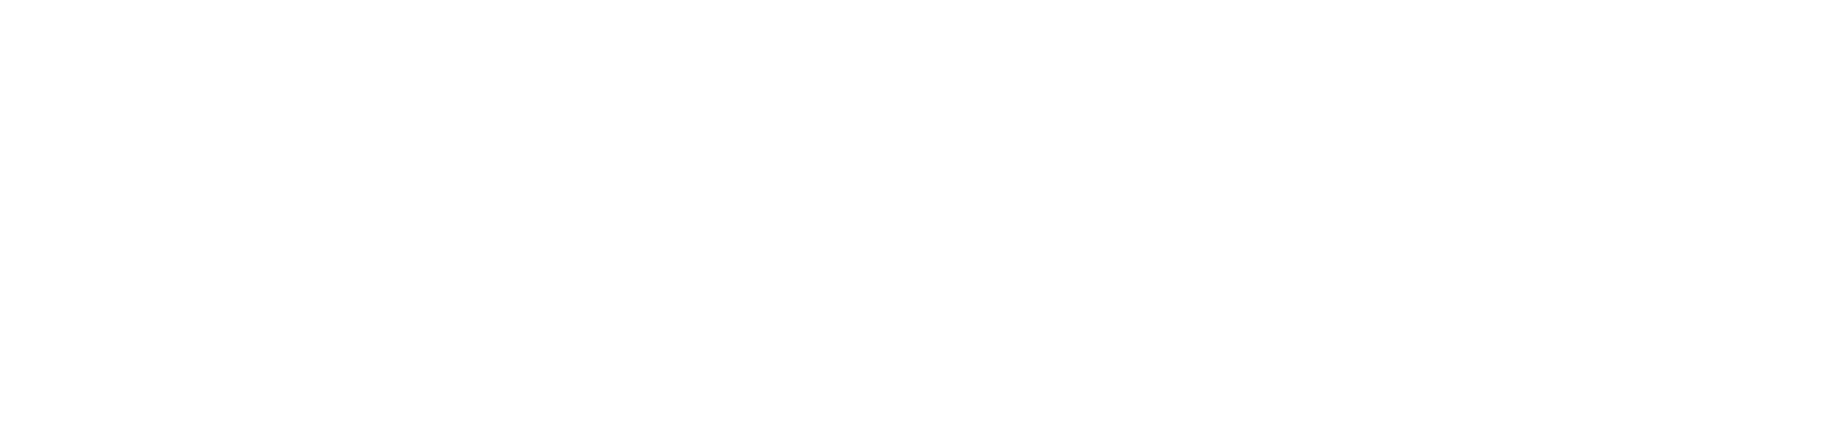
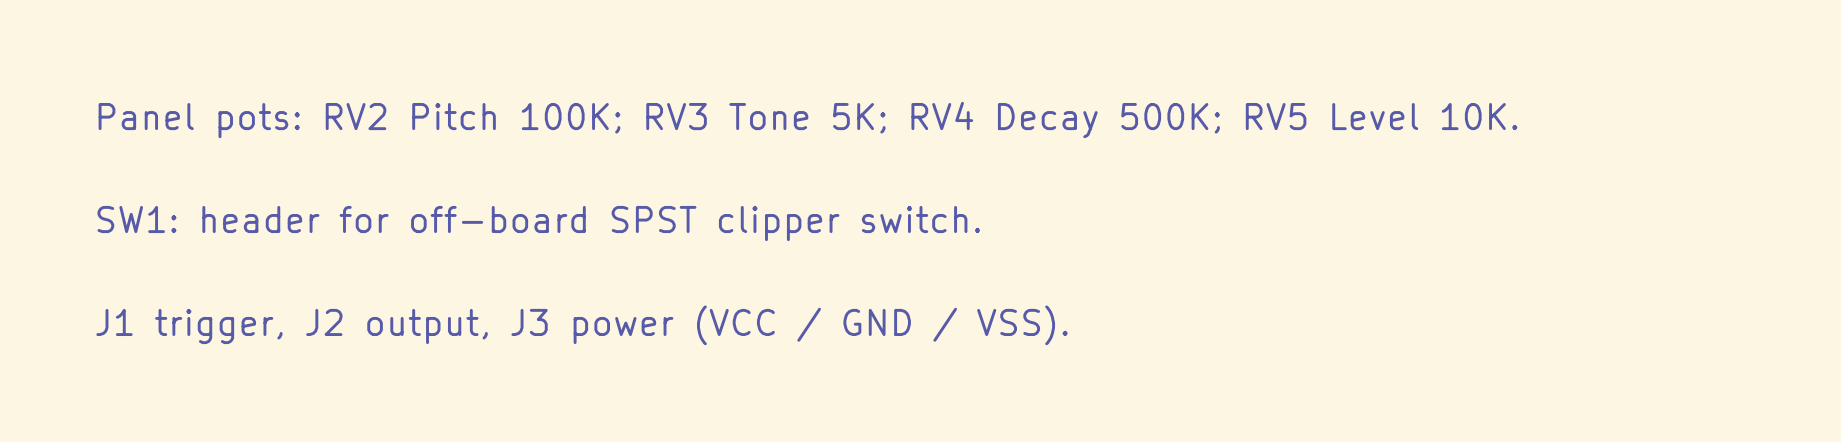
text: none -> Panel pots: RV2 Pitch 100K; RV3 Tone 5K; RV4 Decay 500K; RV5 Level 10K. (807, 120)
text: none -> SW1: header for off-board SPST clipper switch. (538, 223)
text: none -> J1 trigger, J2 output, J3 power (VCC / GND / VSS). (582, 325)

